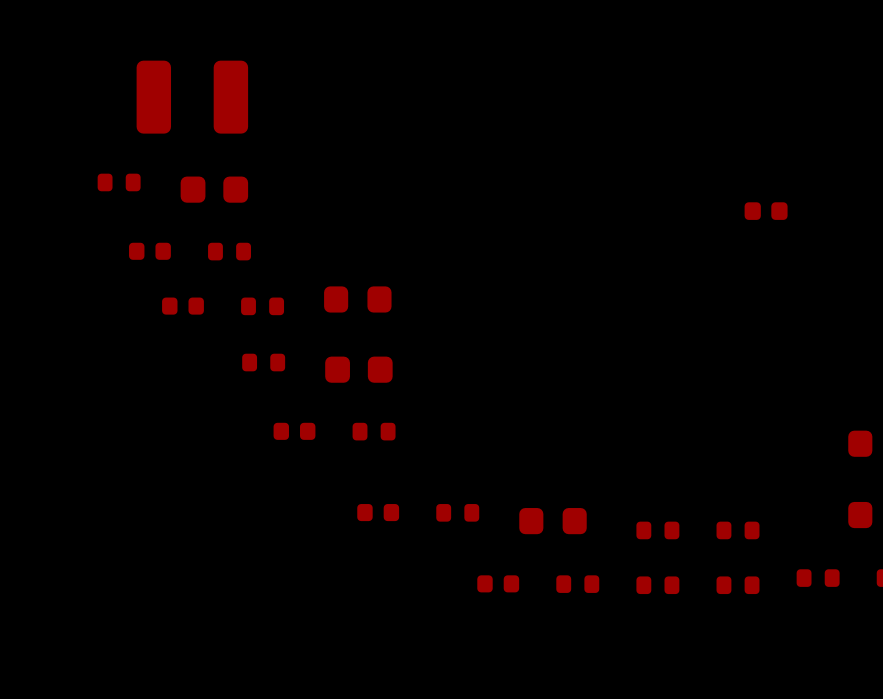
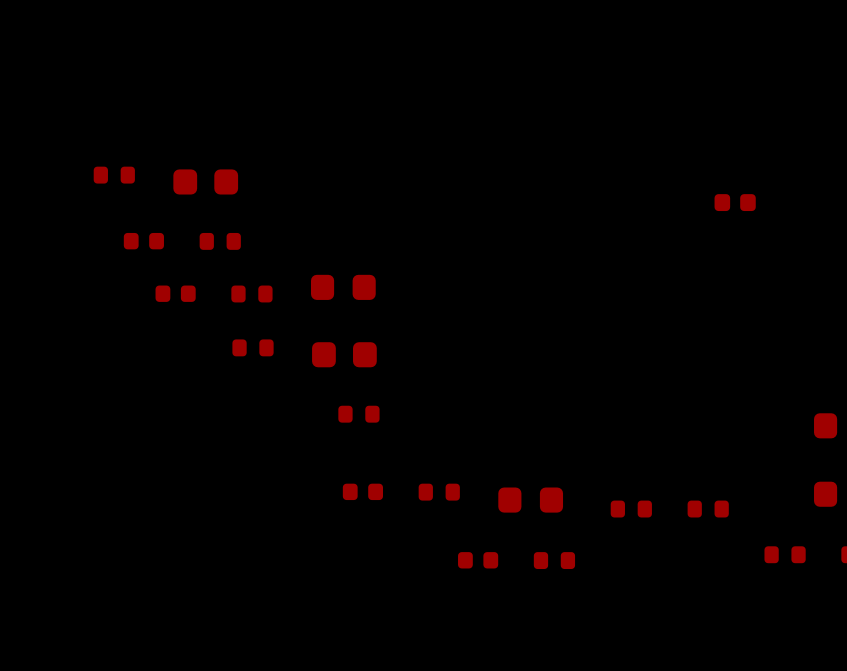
part: (192, 97) -> none
part: (294, 431) -> none
part: (657, 585) -> none
part: (738, 585) -> none

